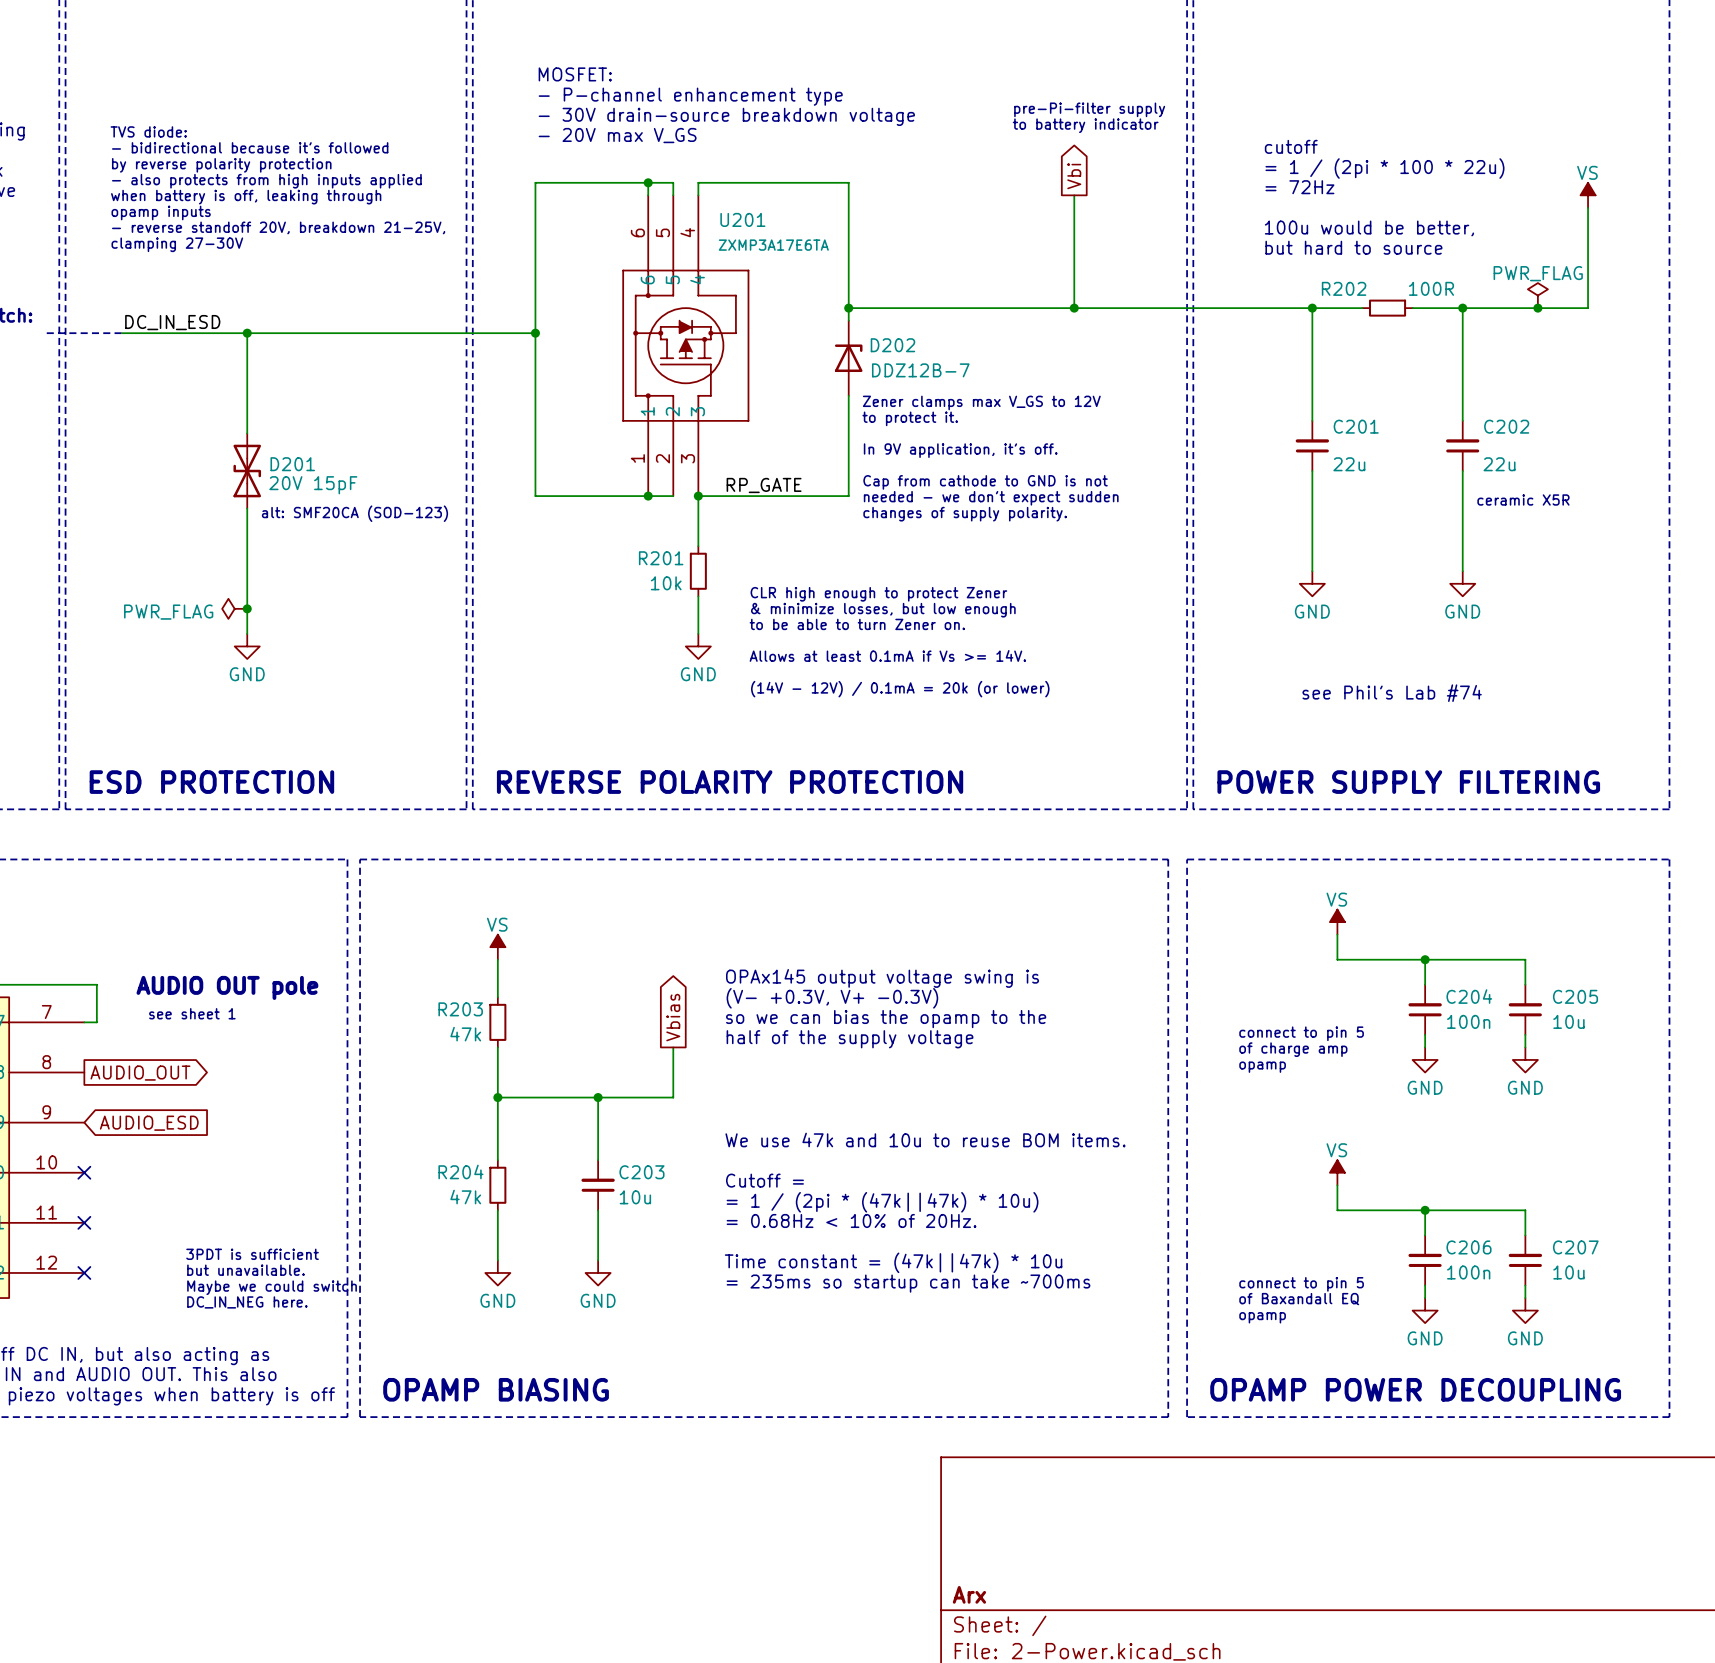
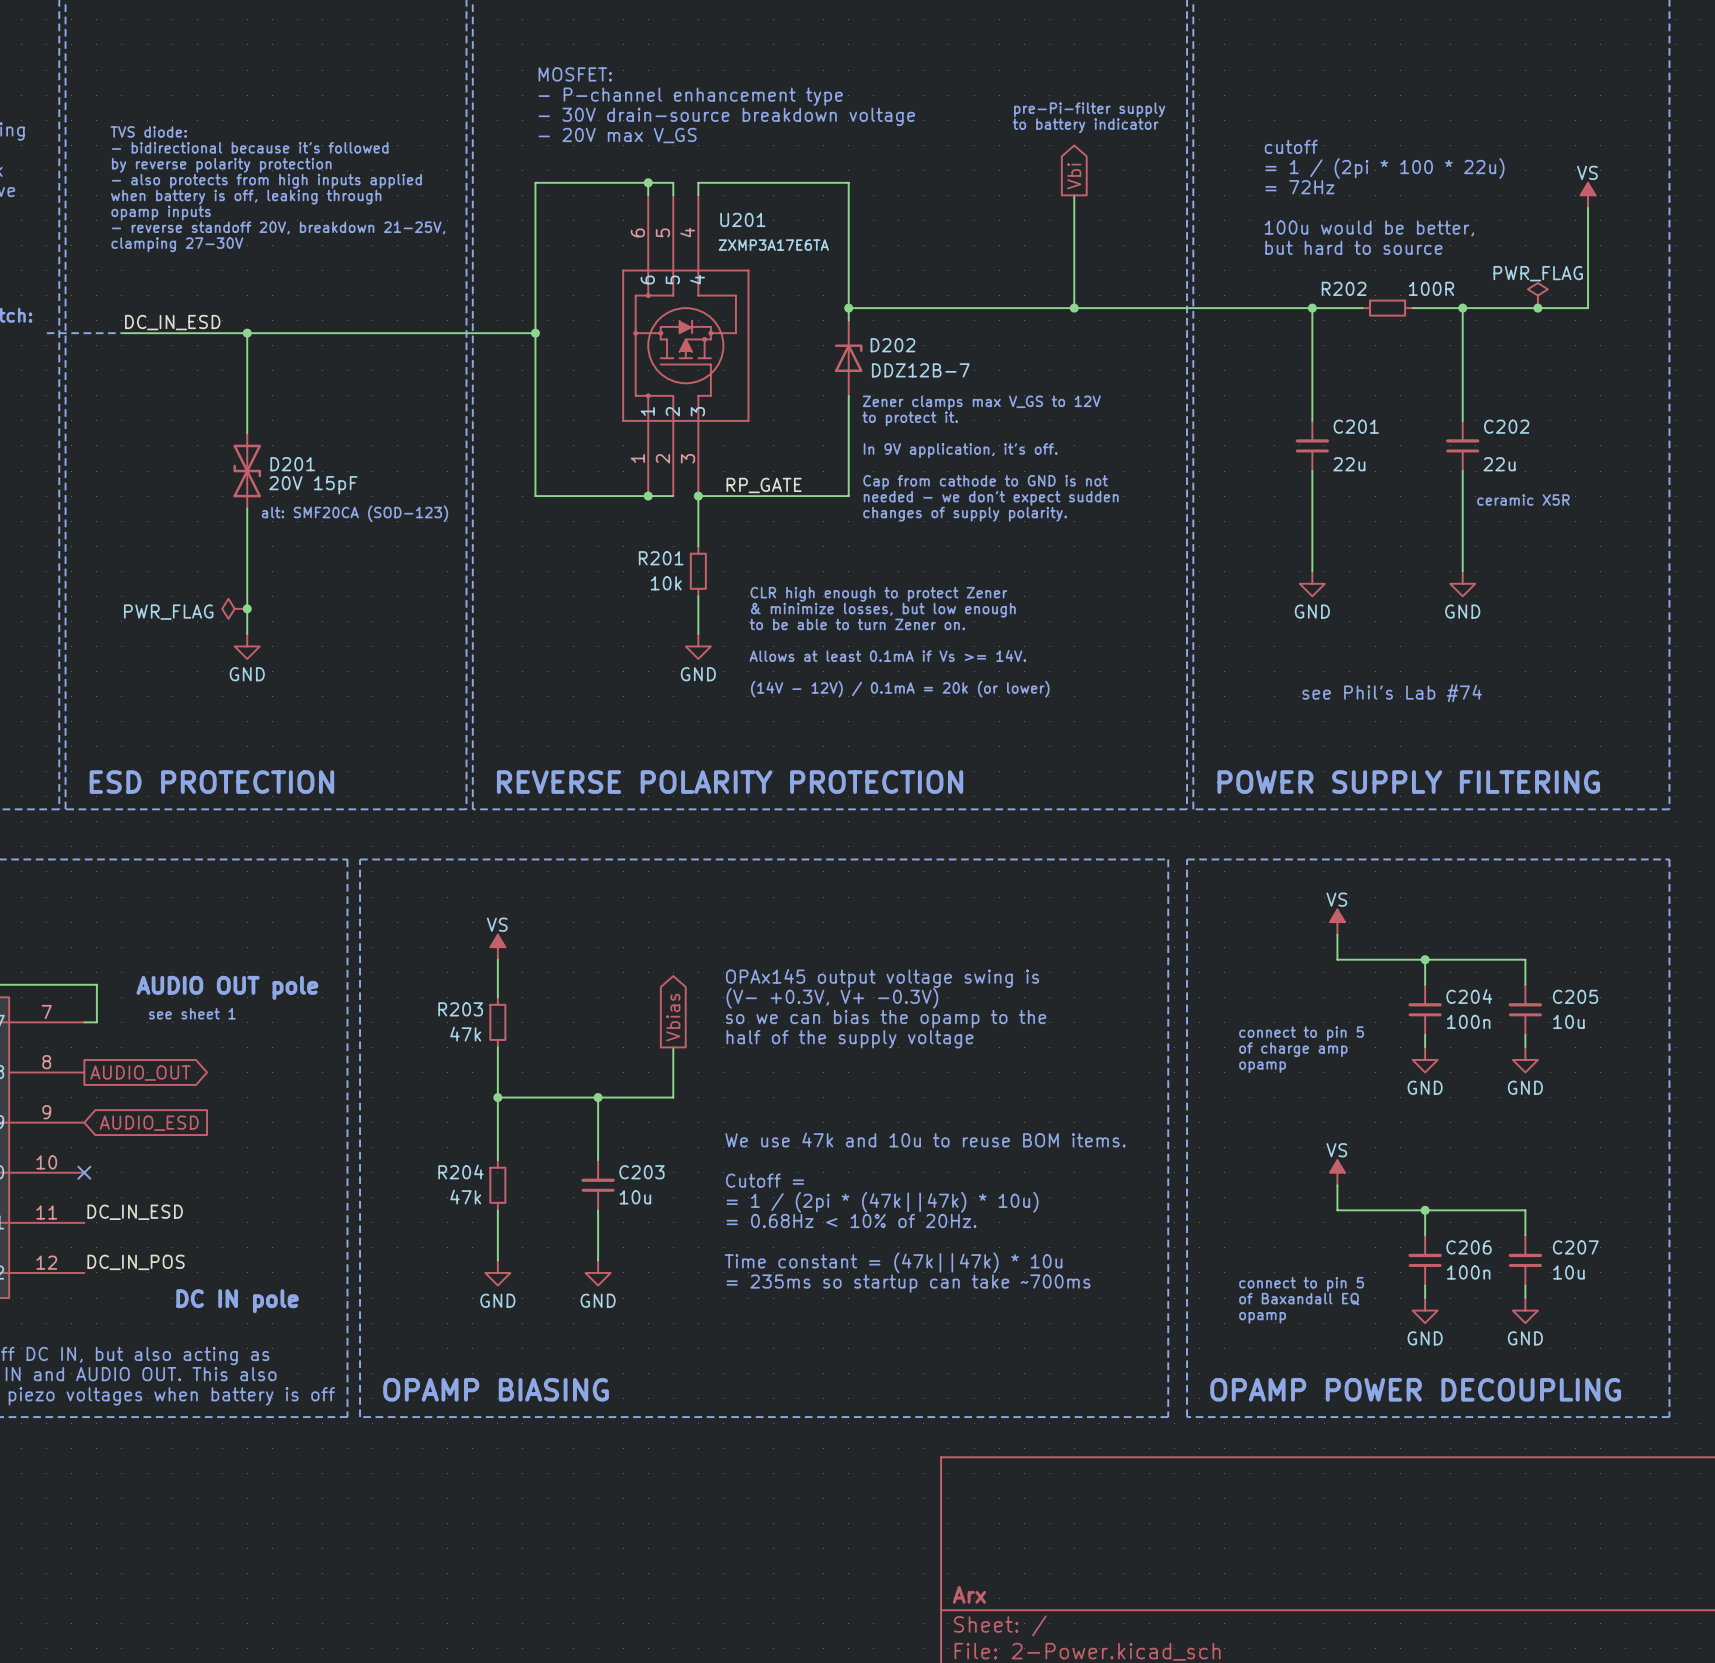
label: none -> DC_IN_ESD (135, 1212)
no-connect mark: (84, 1222) -> none
text: 3PDT is sufficient (252, 1254) -> none
label: none -> DC_IN_POS (136, 1262)
text: but unavailable. (245, 1270) -> none
no-connect mark: (84, 1272) -> none
text: Maybe we could switch (272, 1287) -> none
text: none -> DC IN pole (237, 1301)
text: DC_IN_NEG here. (247, 1302) -> none

